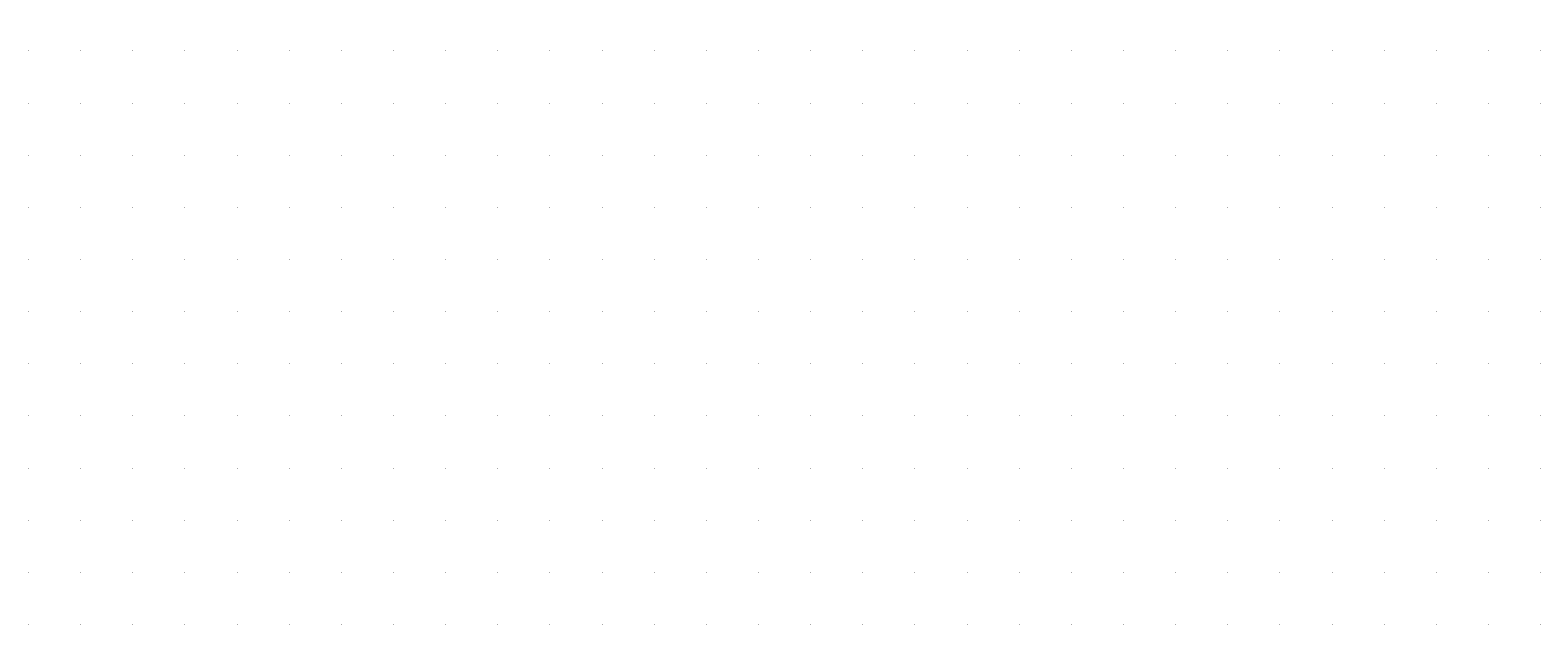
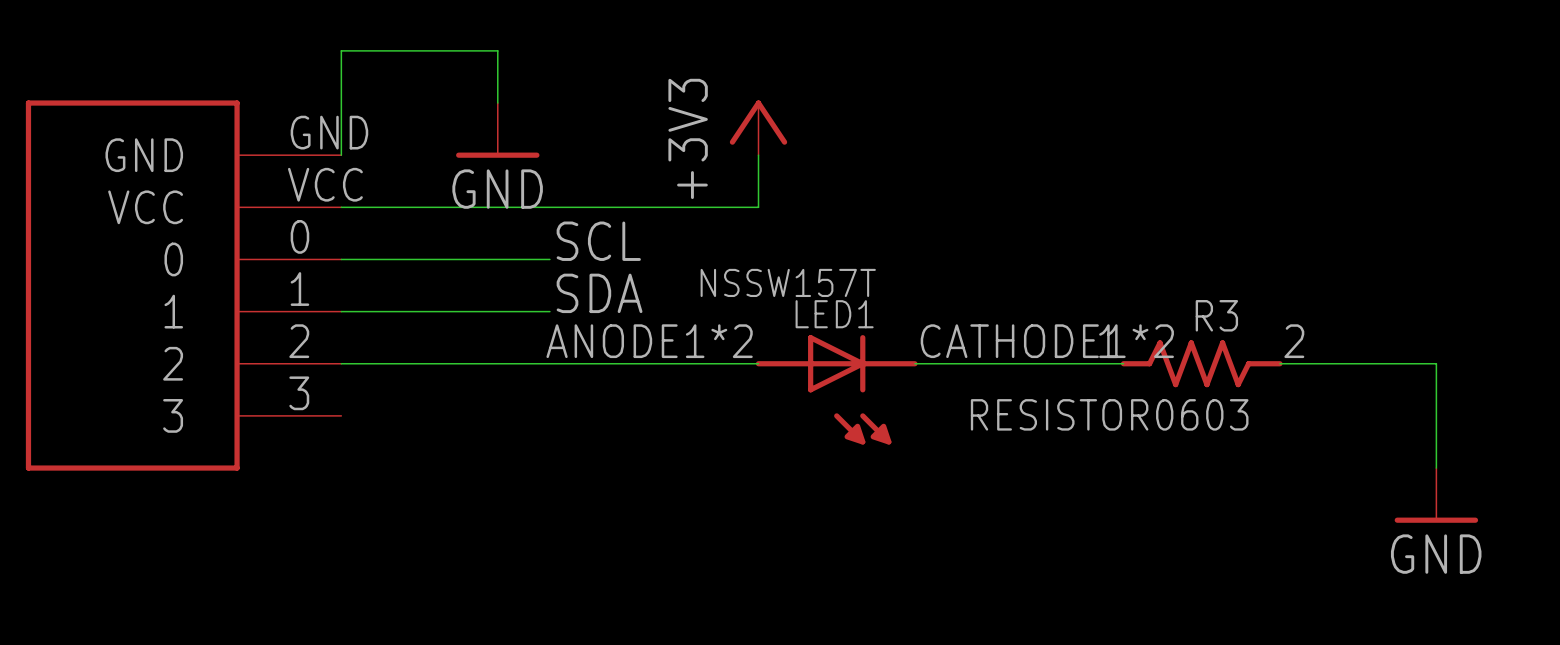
wire: none -> (497, 103) (497, 50) (341, 50) (341, 155)
power symbol: none -> +3V3 (758, 127)
power symbol: none -> GND (497, 130)
wire: none -> (758, 155) (758, 207) (341, 207)
label: none -> SCL (598, 241)
wire: none -> (341, 259) (549, 259)
part: none -> (183, 285)
label: none -> SDA (599, 293)
wire: none -> (341, 311) (549, 311)
wire: none -> (341, 363) (758, 363)
wire: none -> (914, 363) (1123, 363)
R3: none -> RESISTOR0603 (1201, 363)
wire: none -> (1279, 363) (1436, 363) (1436, 468)
LED1: none -> NSSW157T (836, 389)
power symbol: none -> GND (1436, 495)

